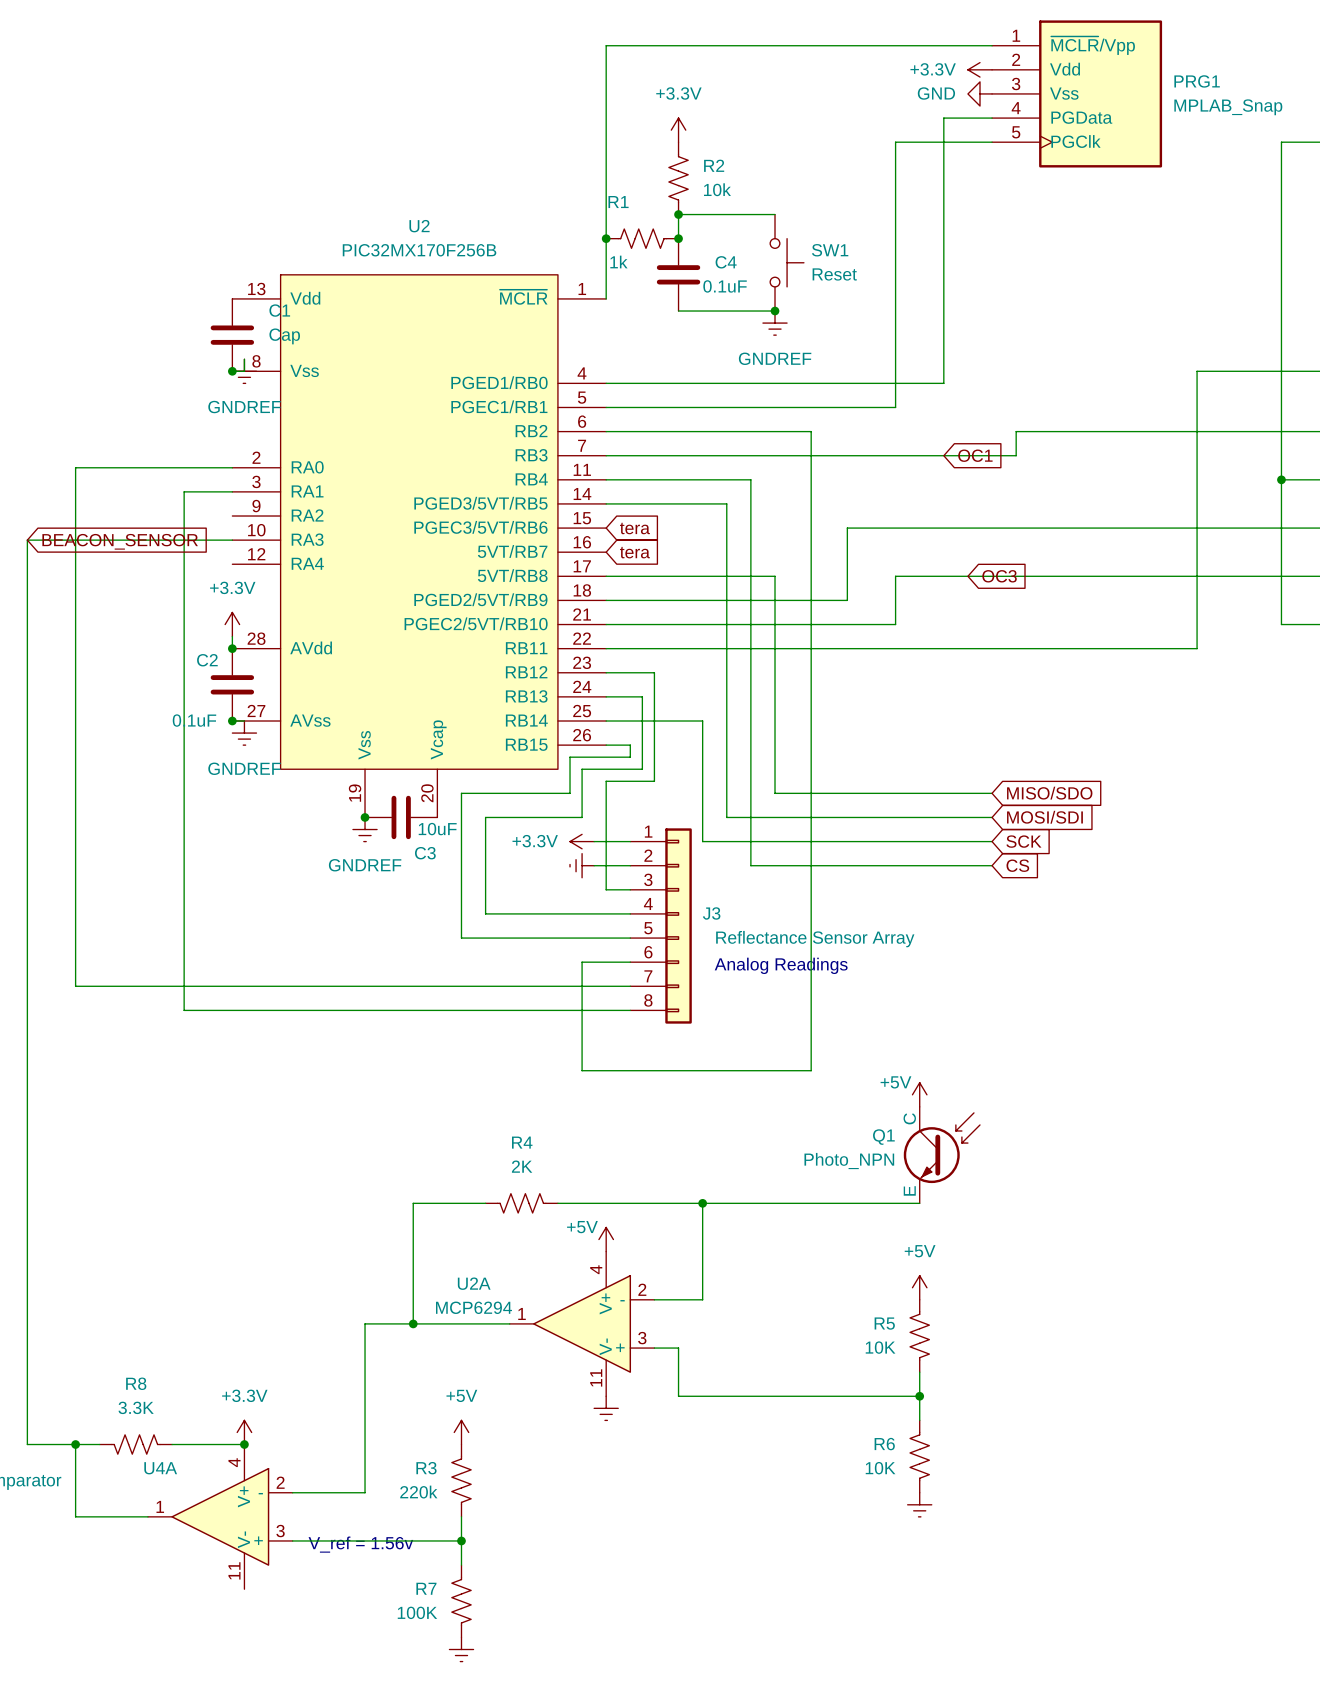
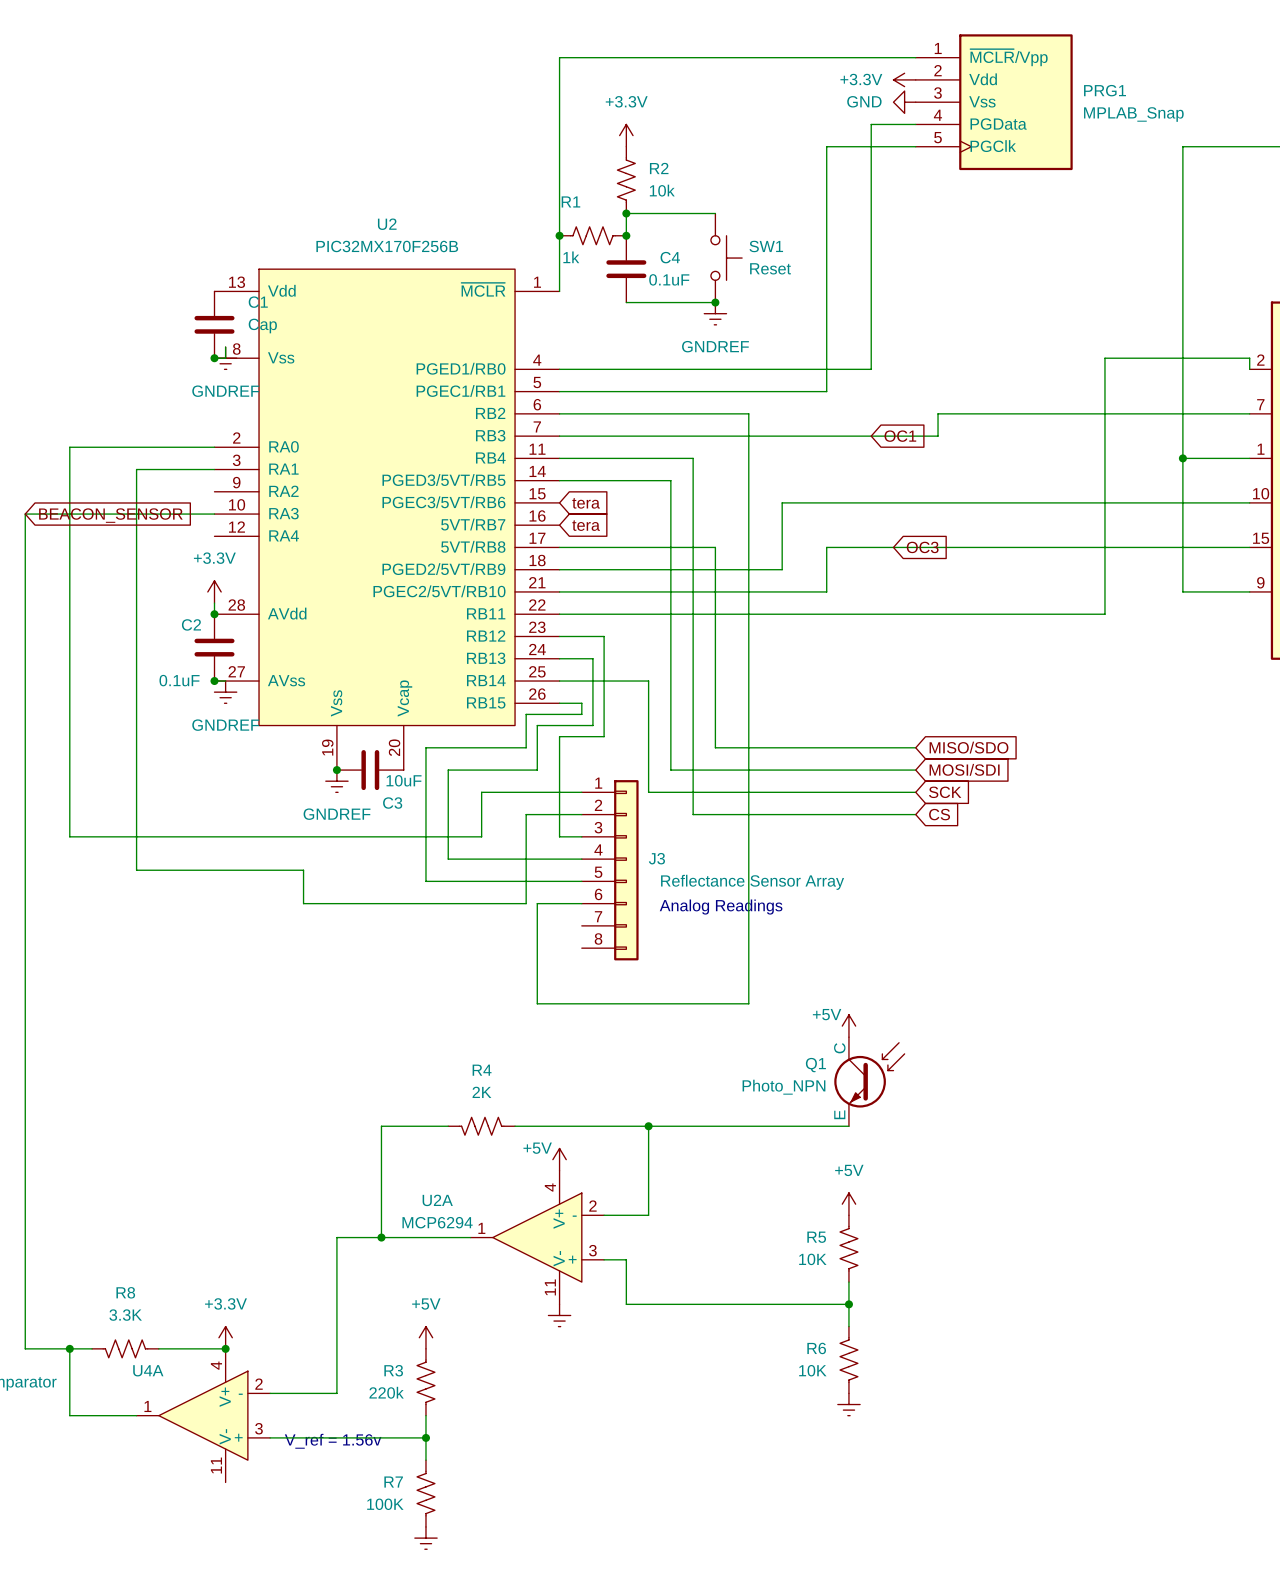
wire: (184, 491) (184, 1010) (630, 1010) -> (169, 469) (136, 469) (136, 870) (303, 870) (303, 903) (526, 903) (526, 814) (548, 814)
power symbol: +3.3V (582, 841) -> none
power symbol: (582, 865) -> none
wire: (75, 889) (75, 986) (630, 986) -> (69, 836) (481, 836) (481, 792) (548, 792)

